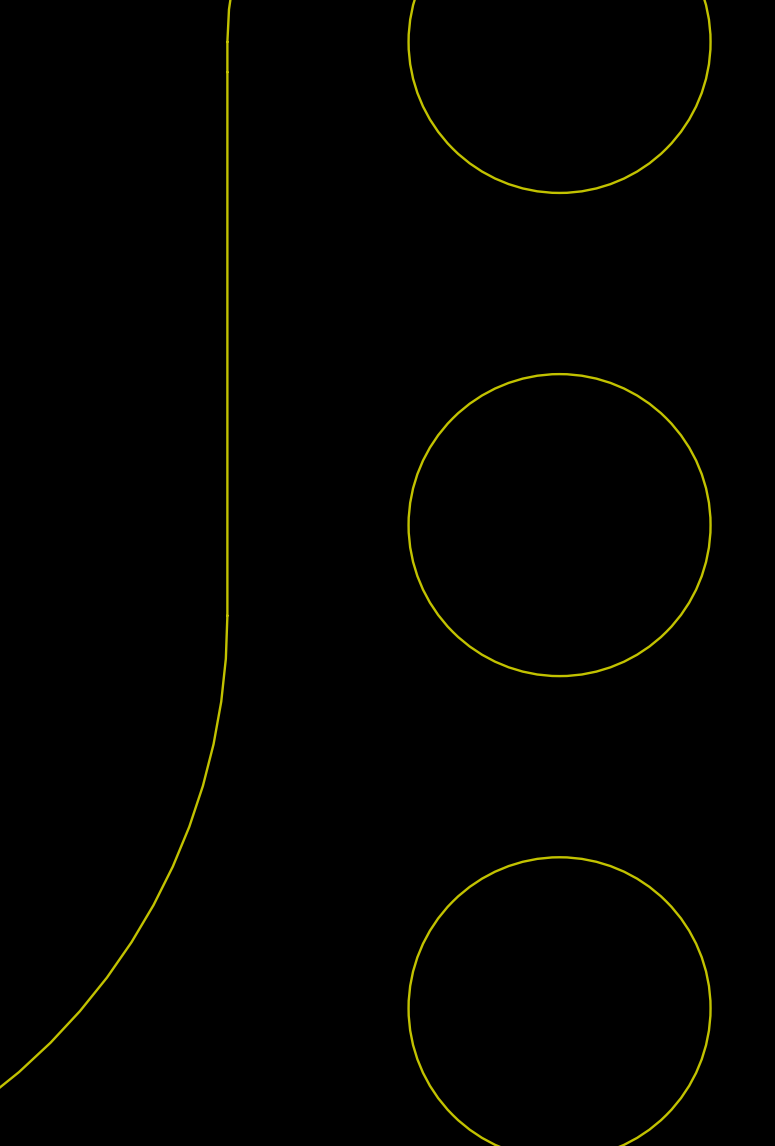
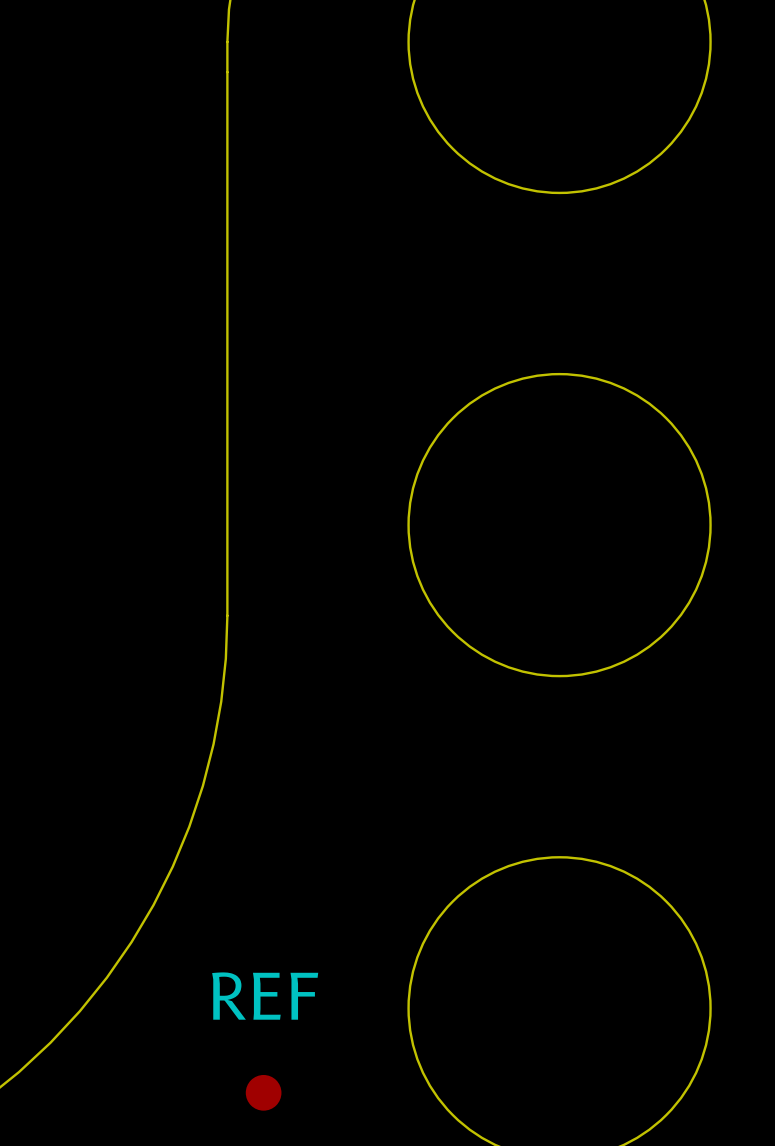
REF: none -> (263, 1092)

